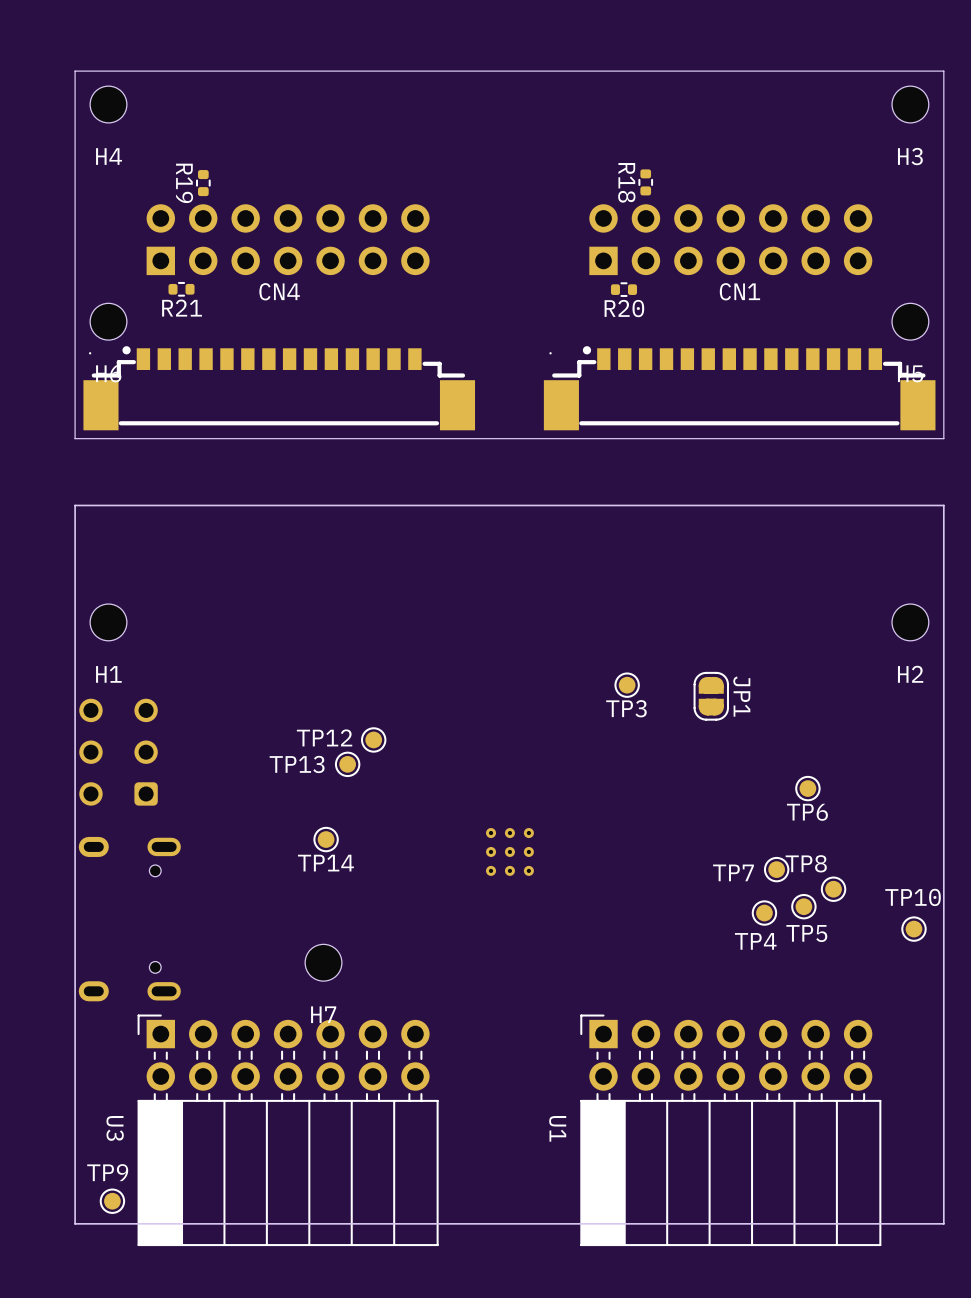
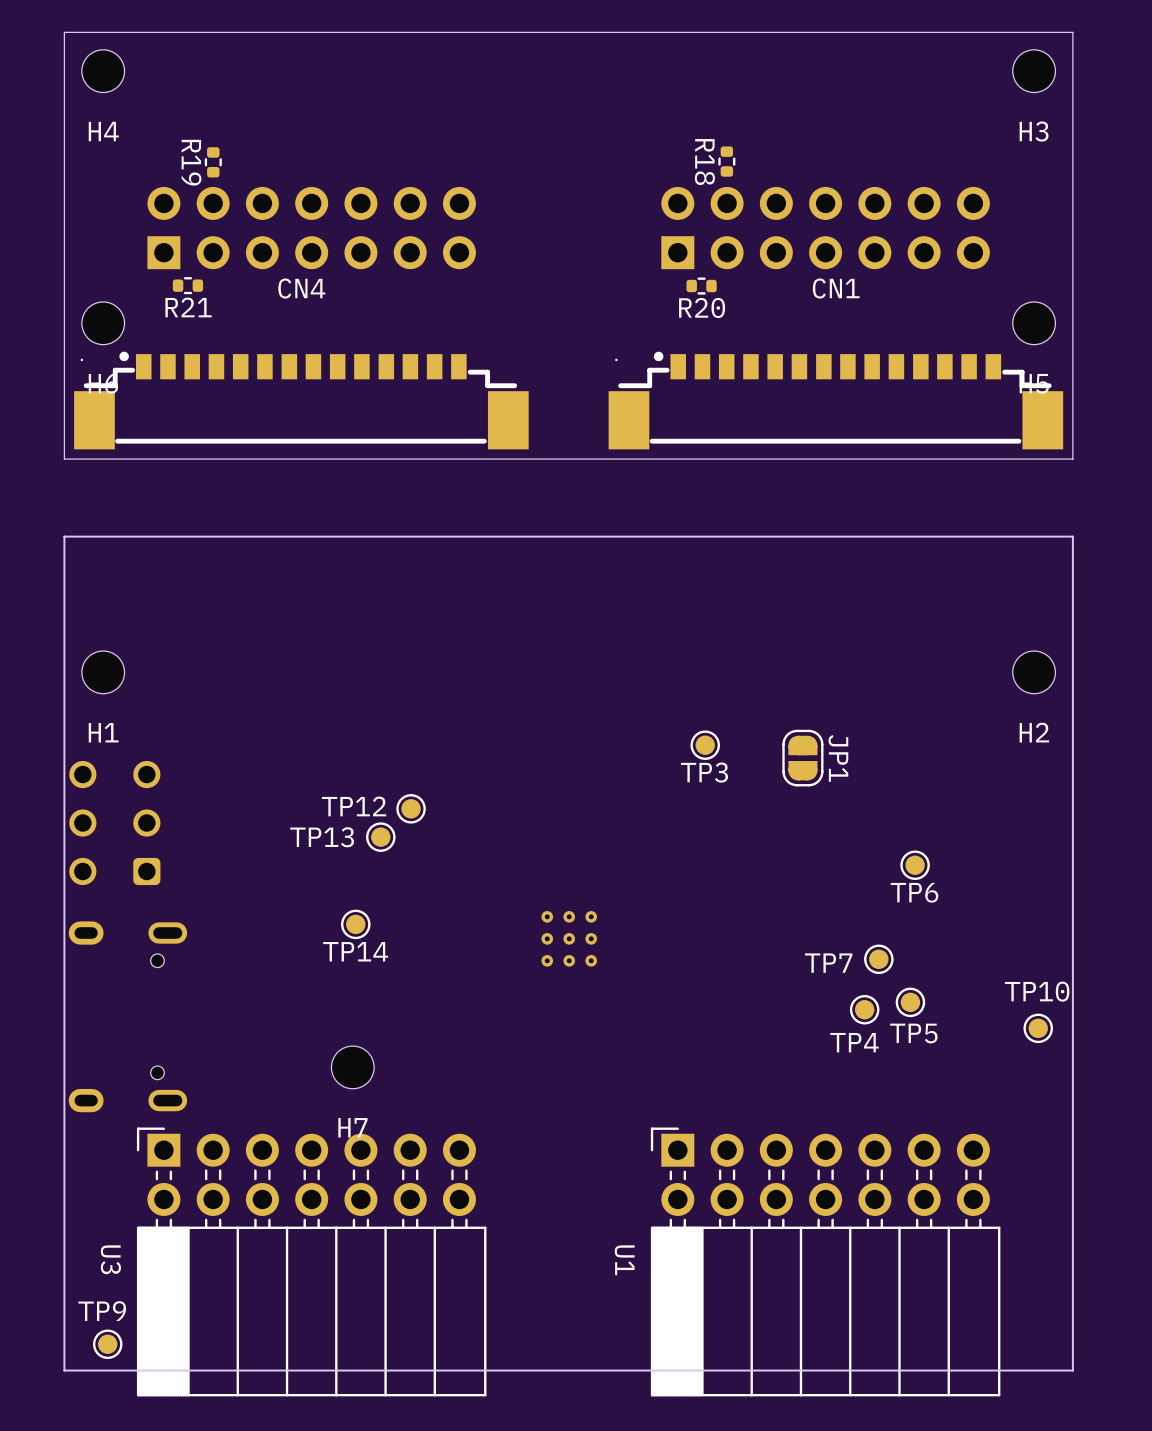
TP8: (833, 889) -> none

